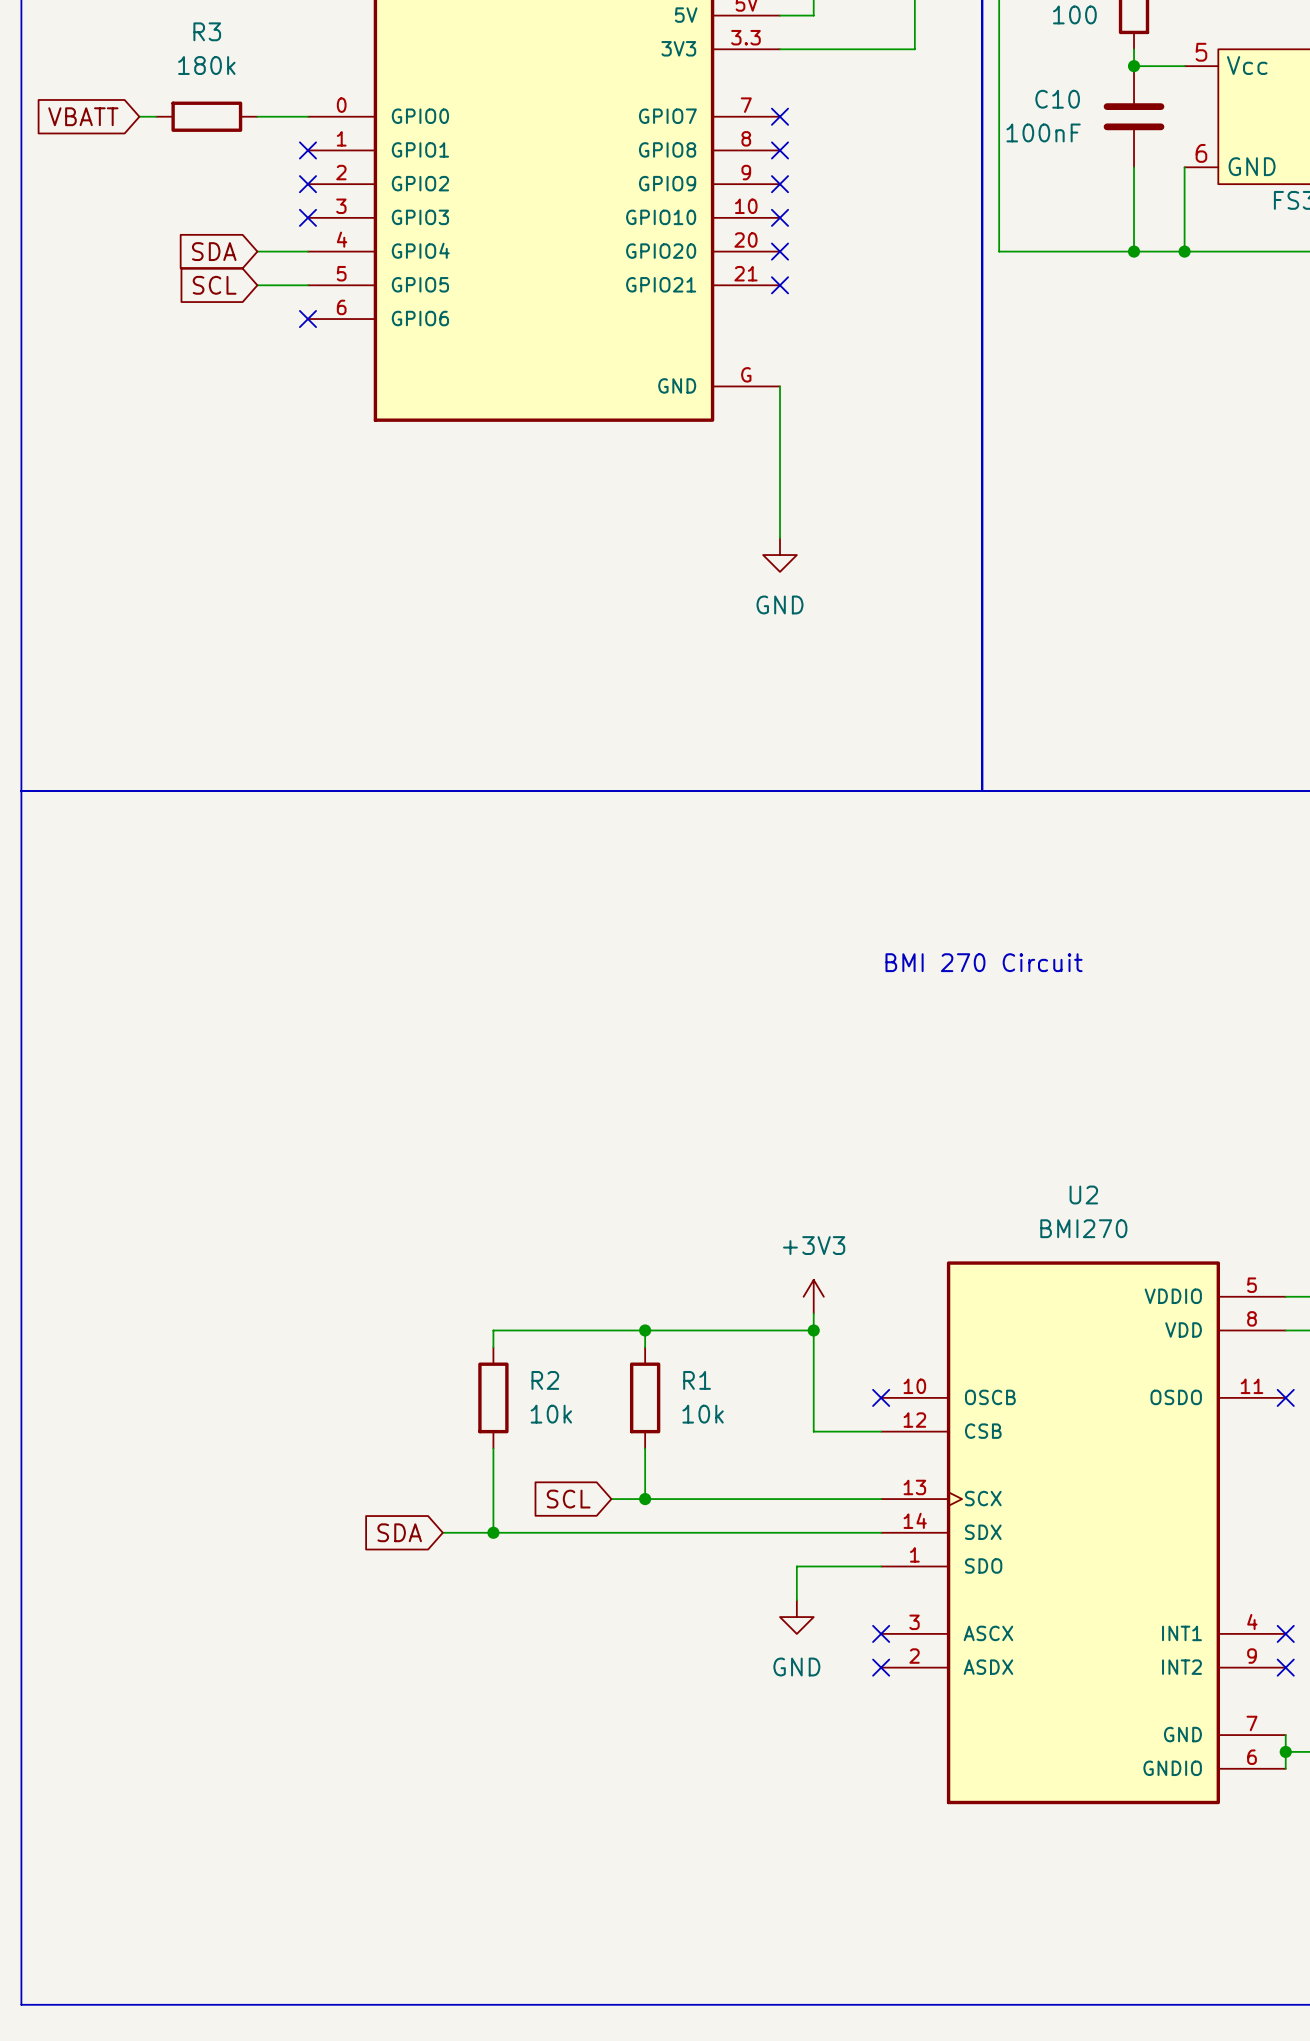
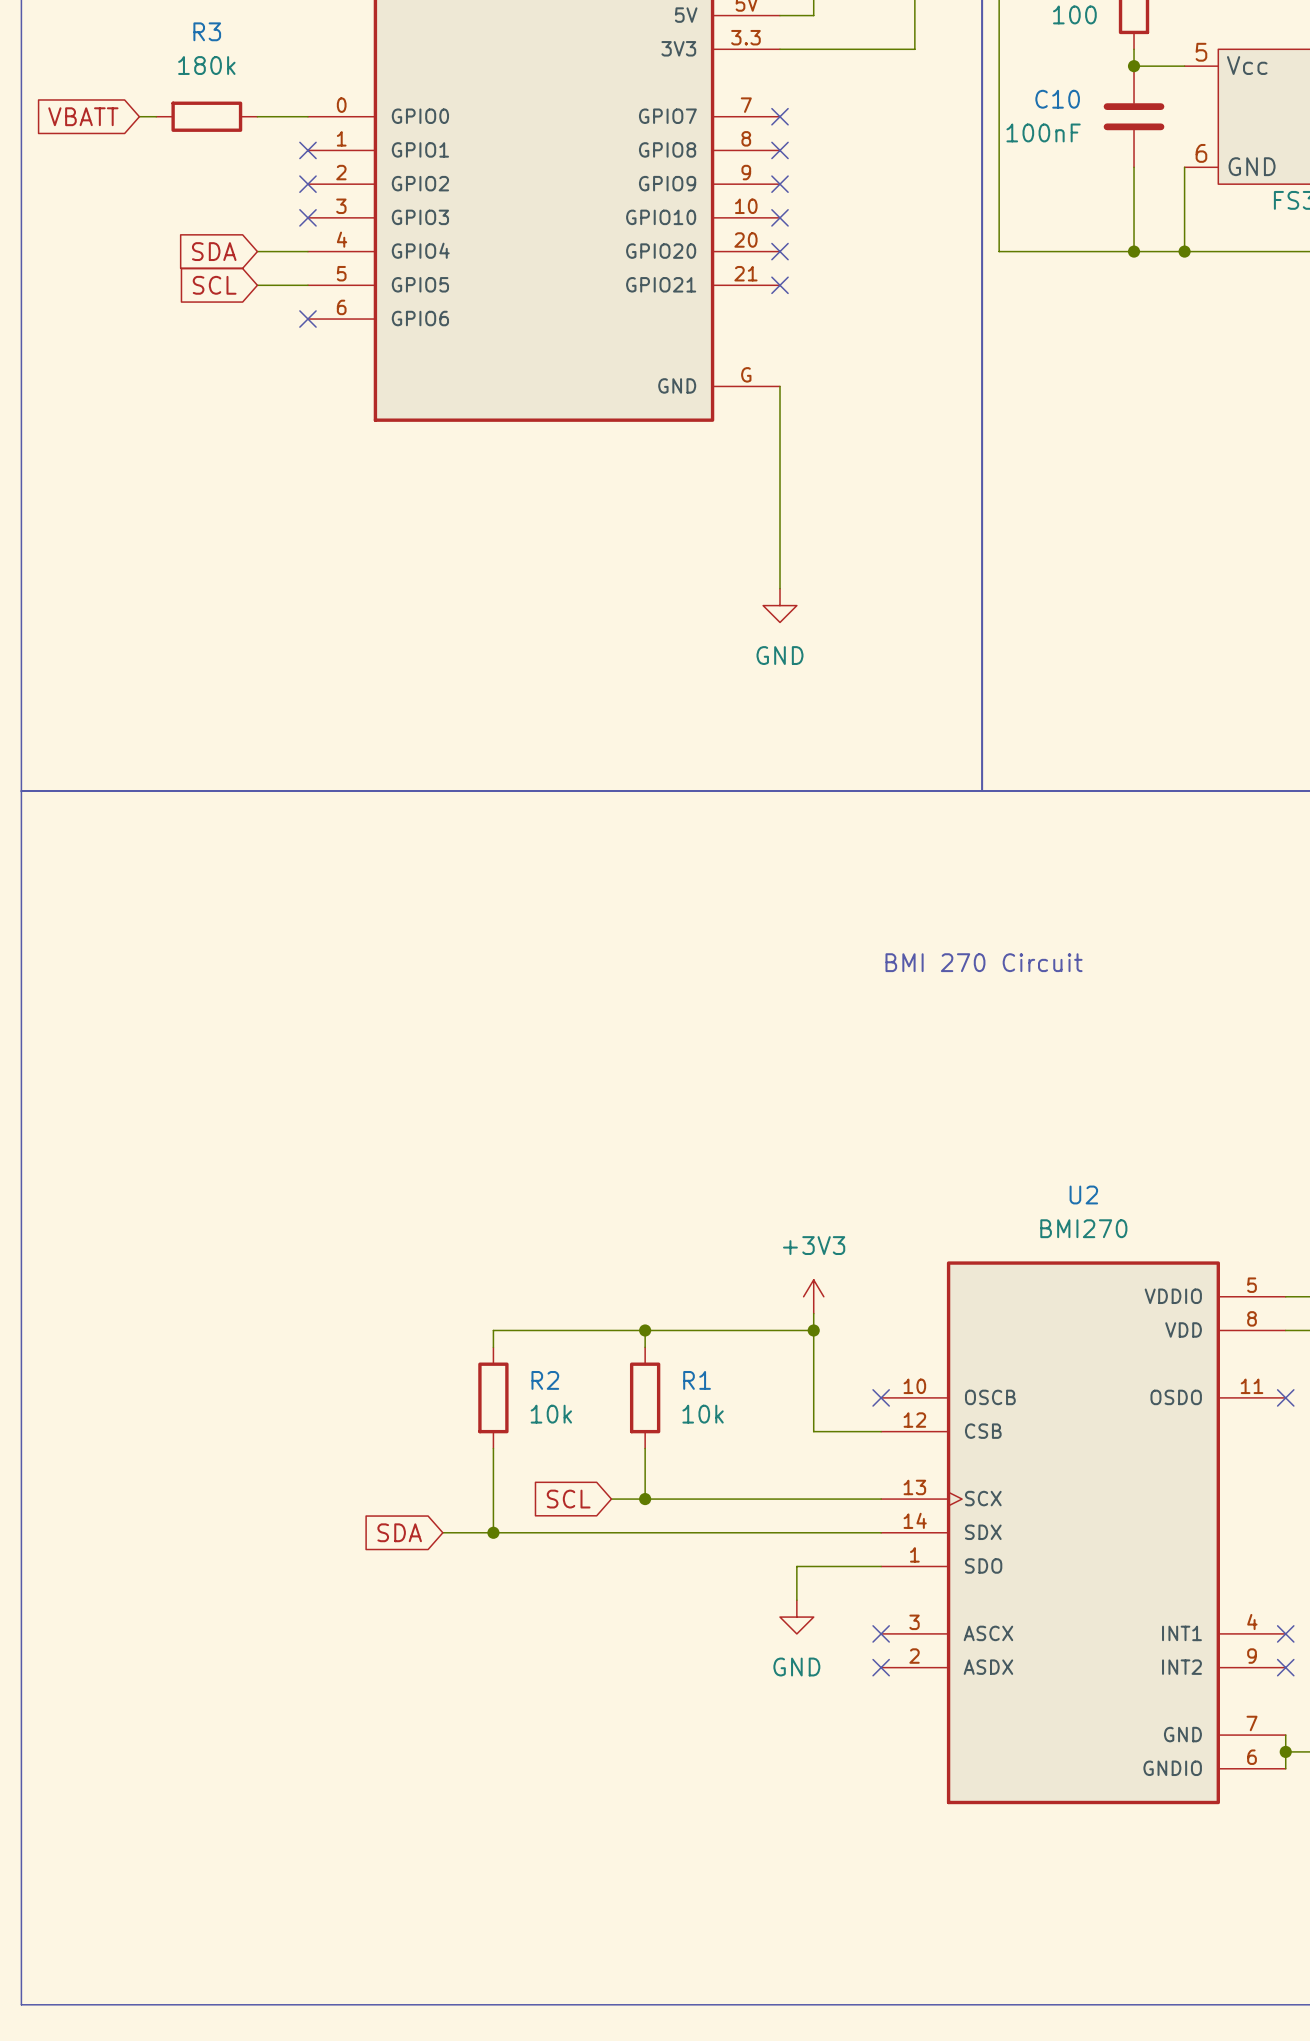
wire: none -> (780, 538) (780, 588)
power symbol position: GND (780, 555) -> GND (780, 605)

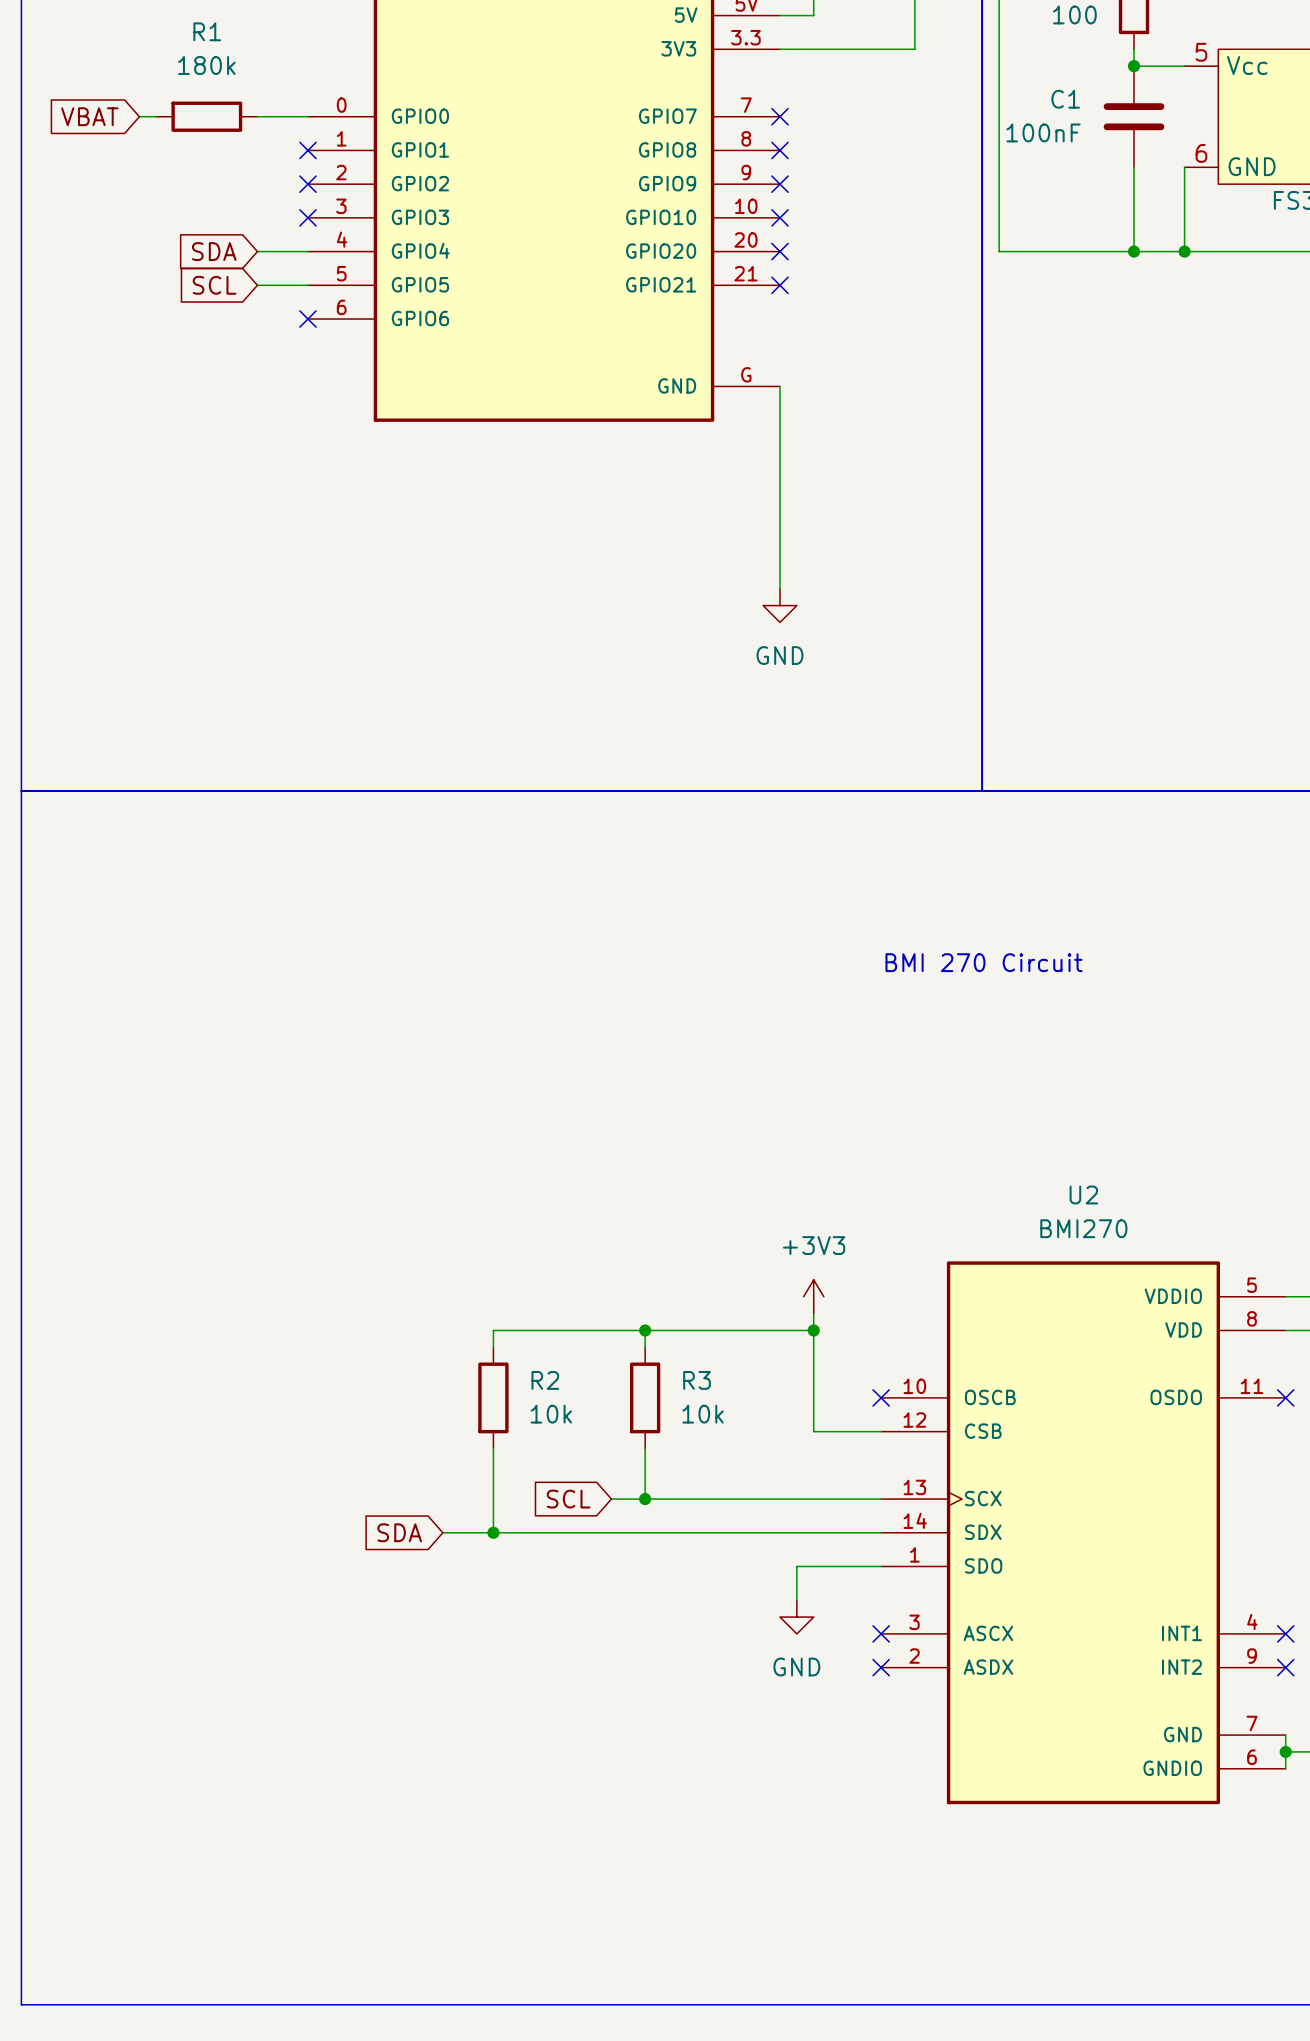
R3 name: R3 (207, 31) -> R1 (207, 31)
C10 name: C10 (1057, 99) -> C1 (1065, 99)
global label: VBATT (83, 116) -> VBAT (89, 116)
R1 name: R1 (697, 1380) -> R3 (697, 1380)

